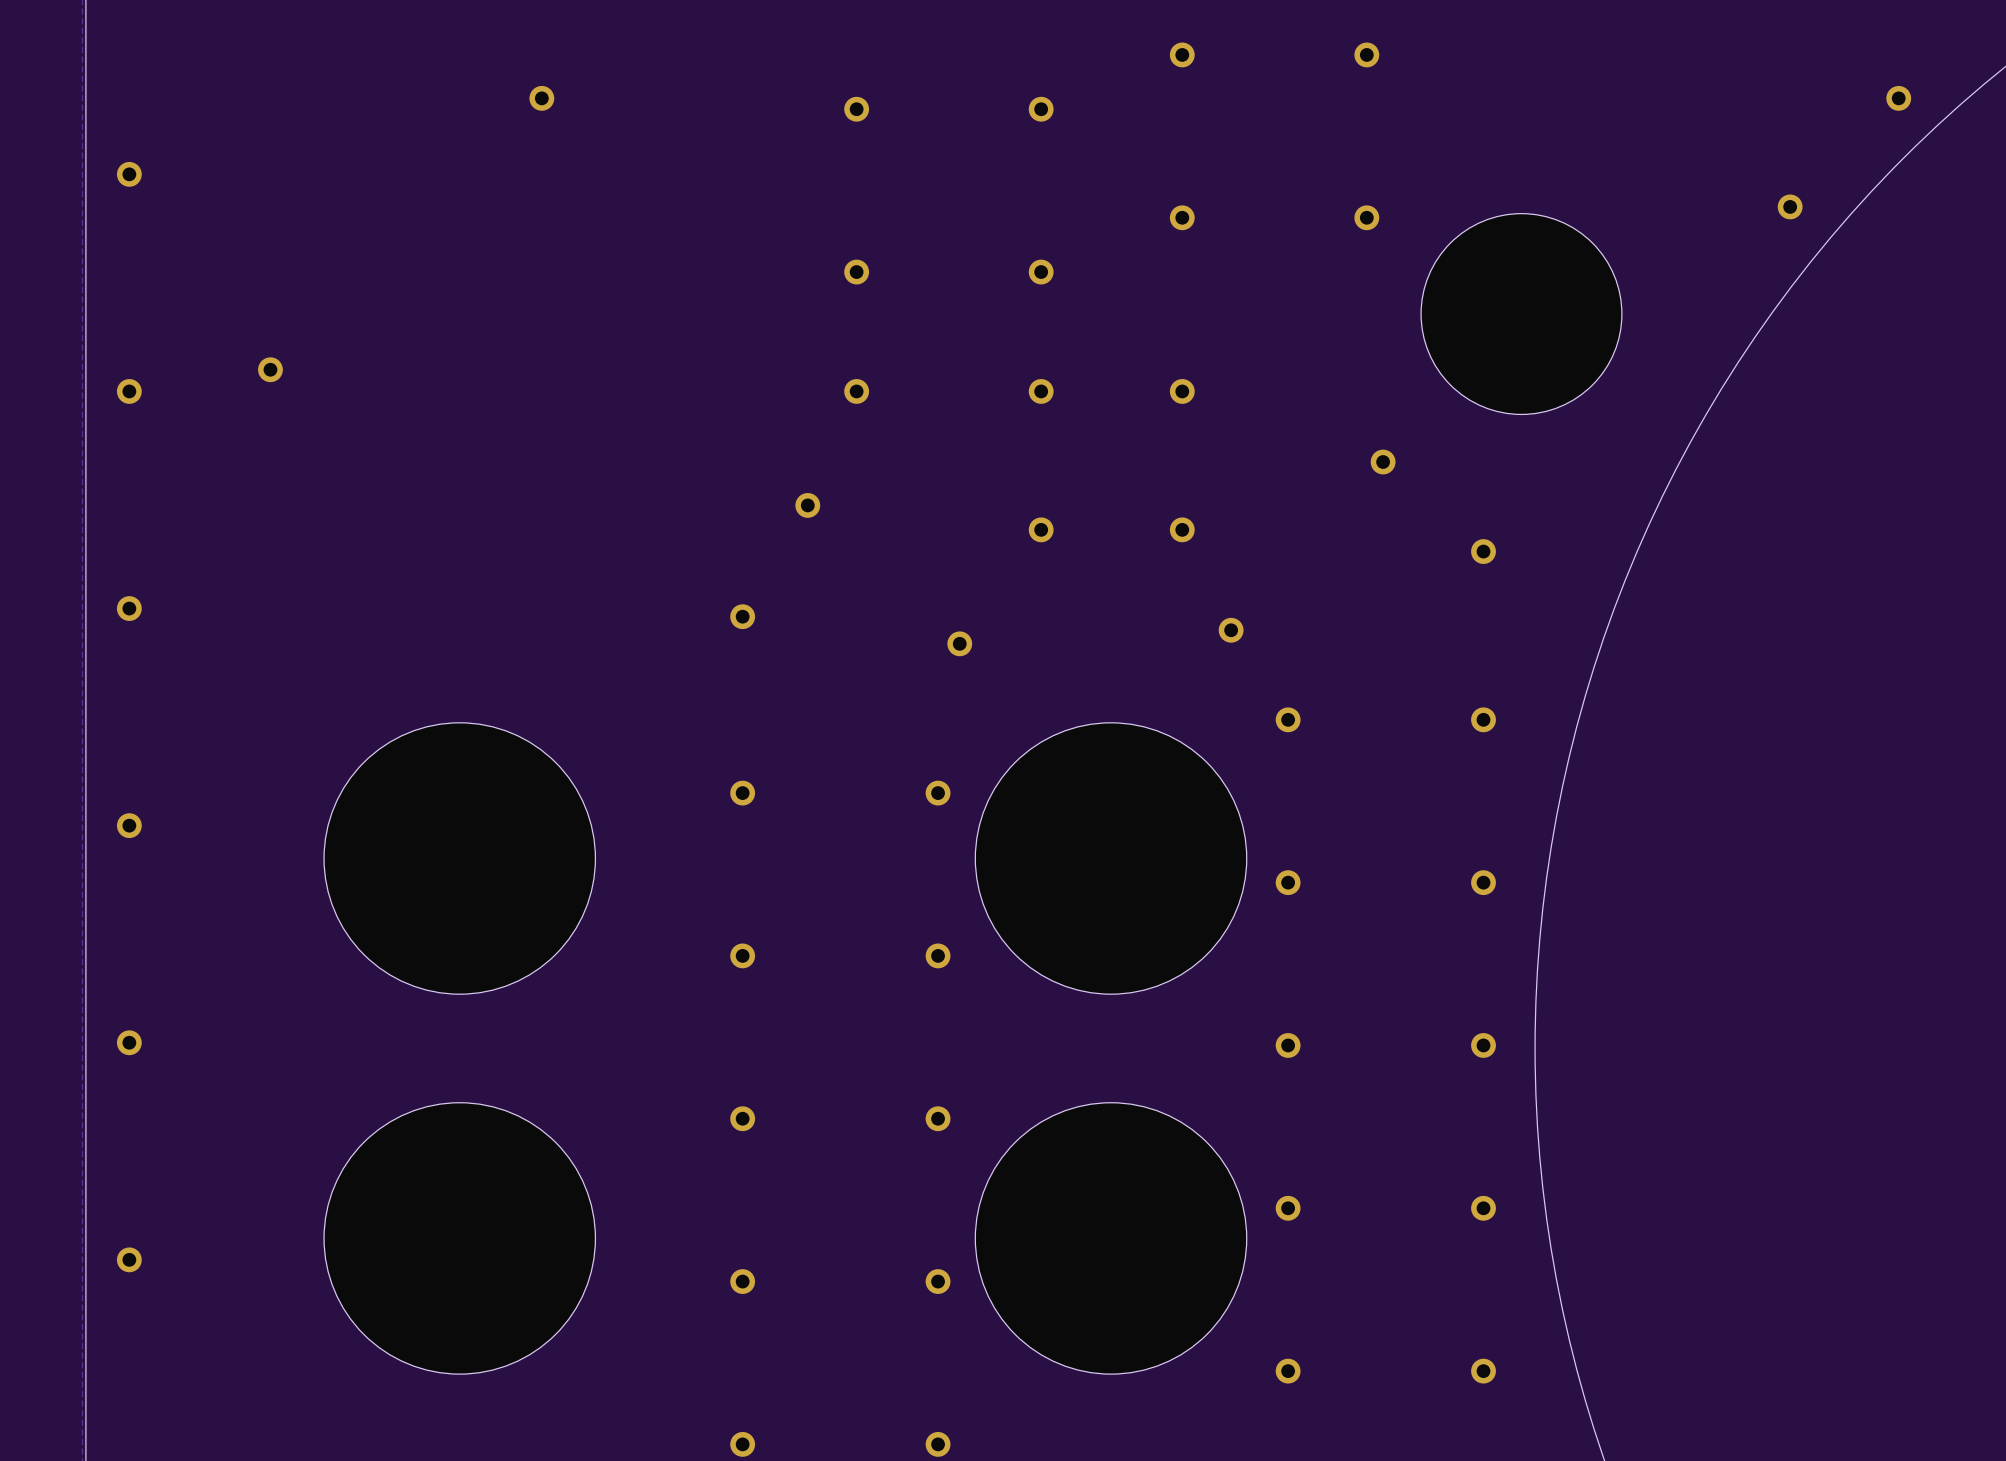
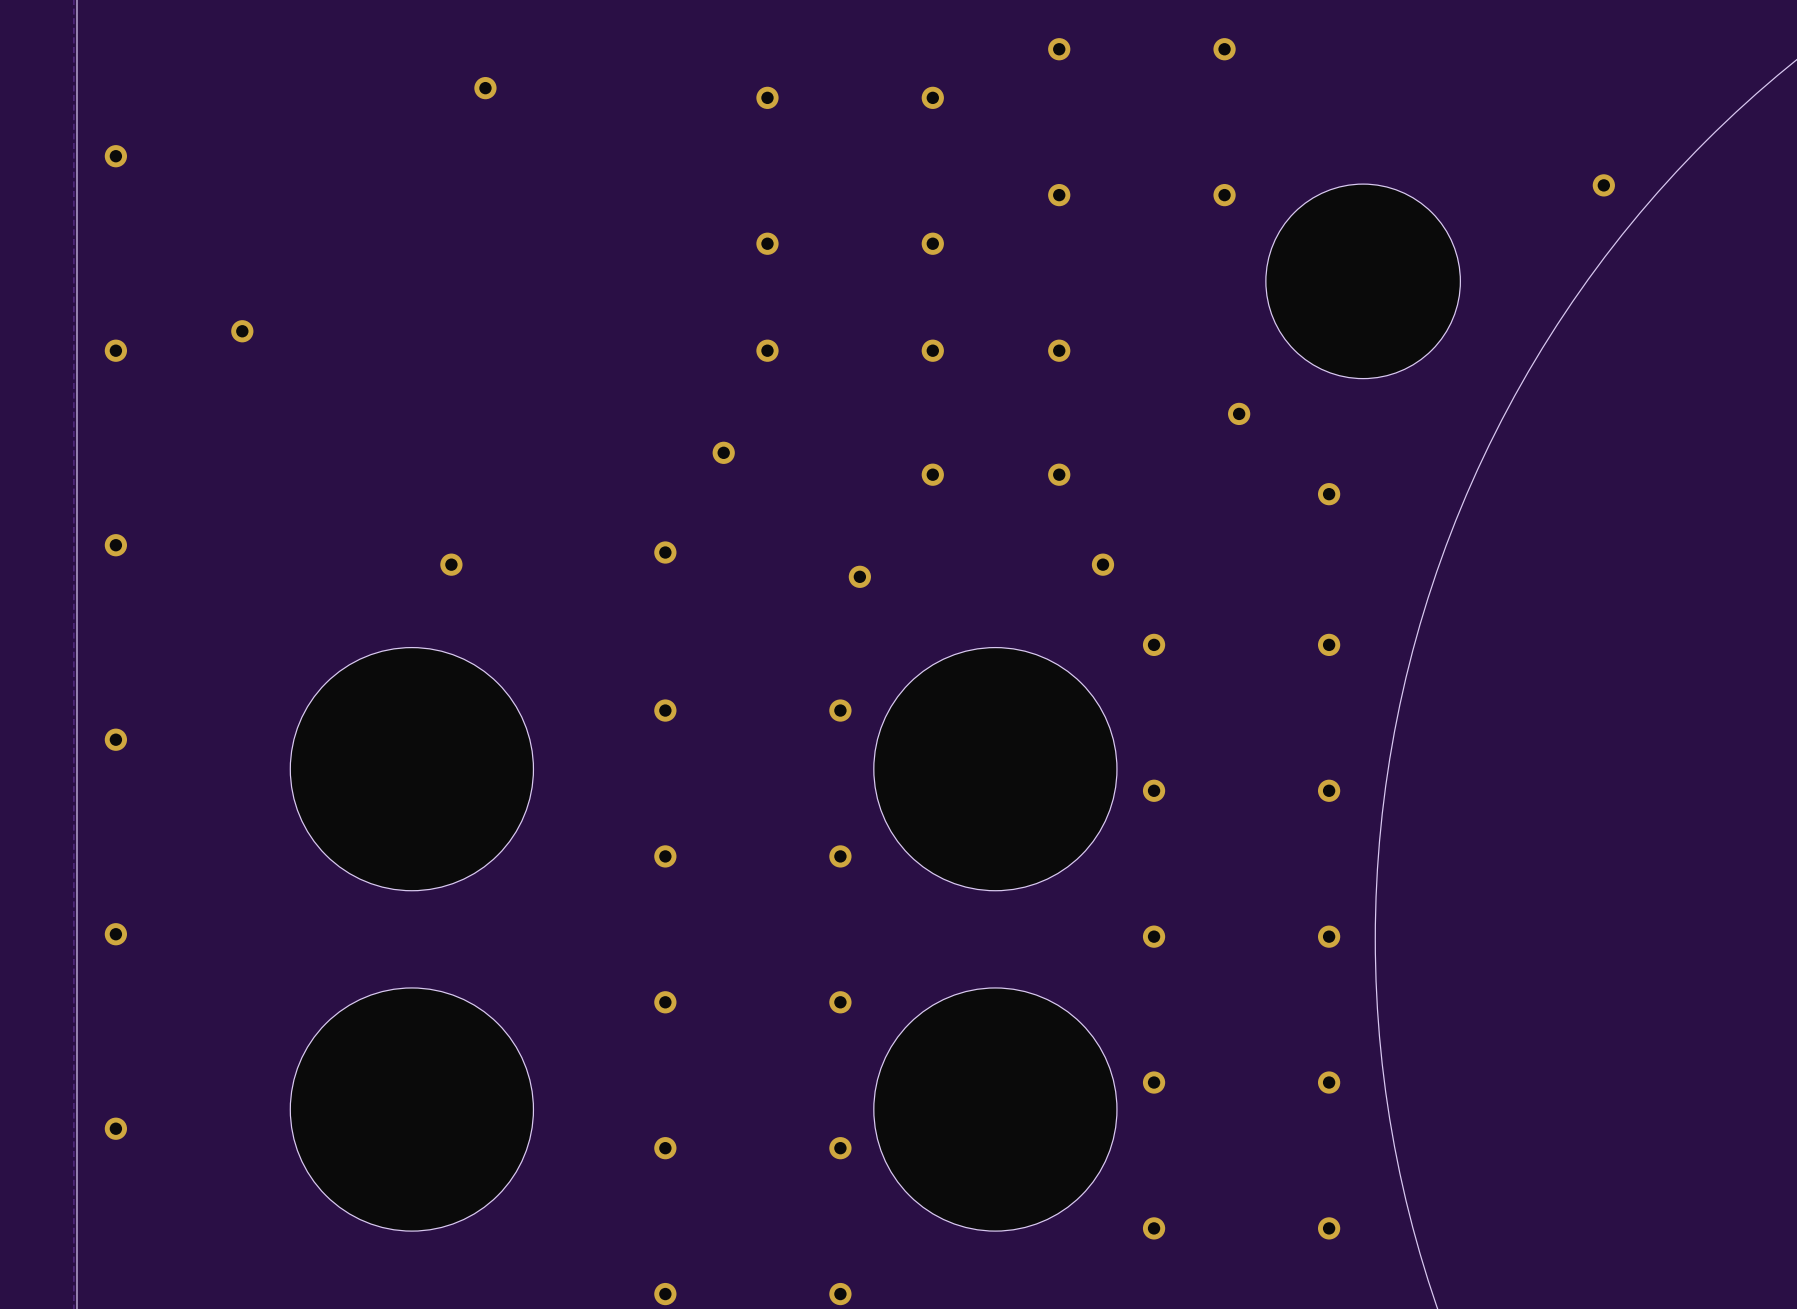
via: (1898, 98) -> none
part footprint: [1421, 213, 1622, 415] -> [1265, 184, 1461, 379]
via: none -> (451, 564)

